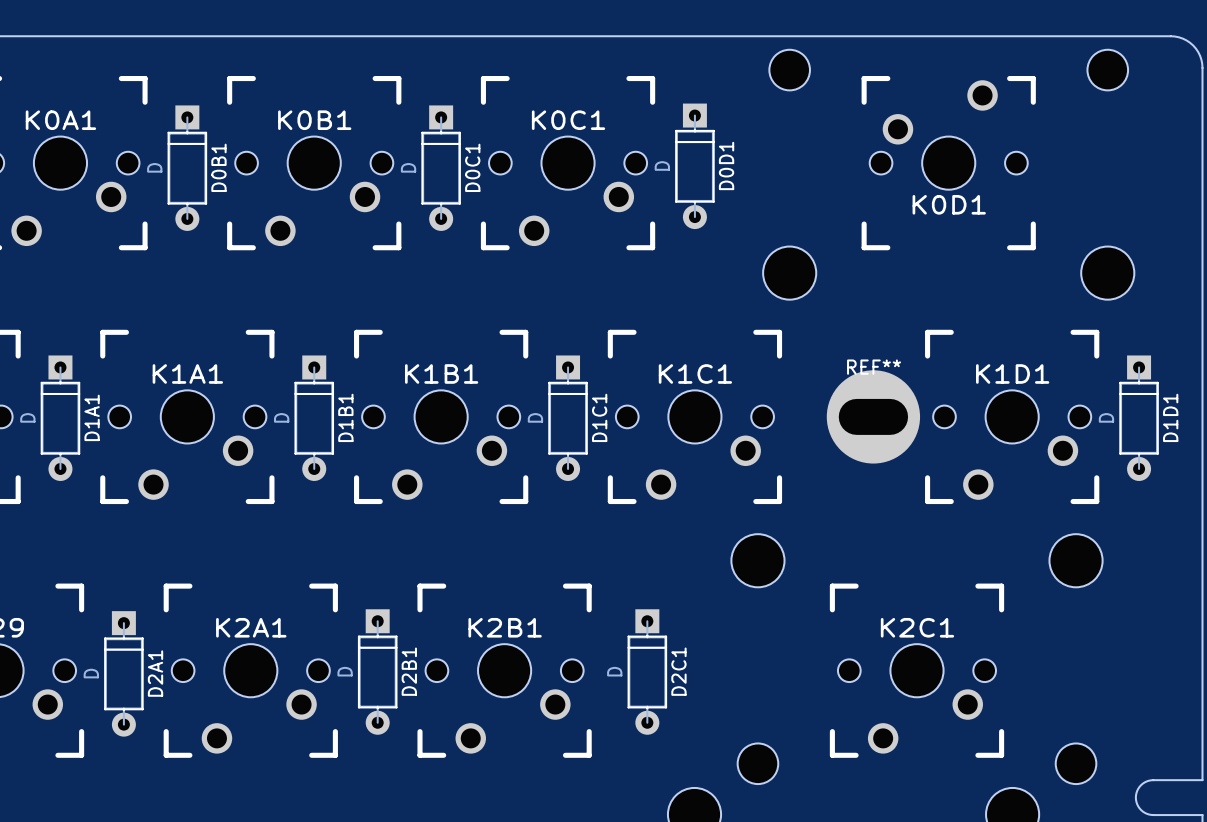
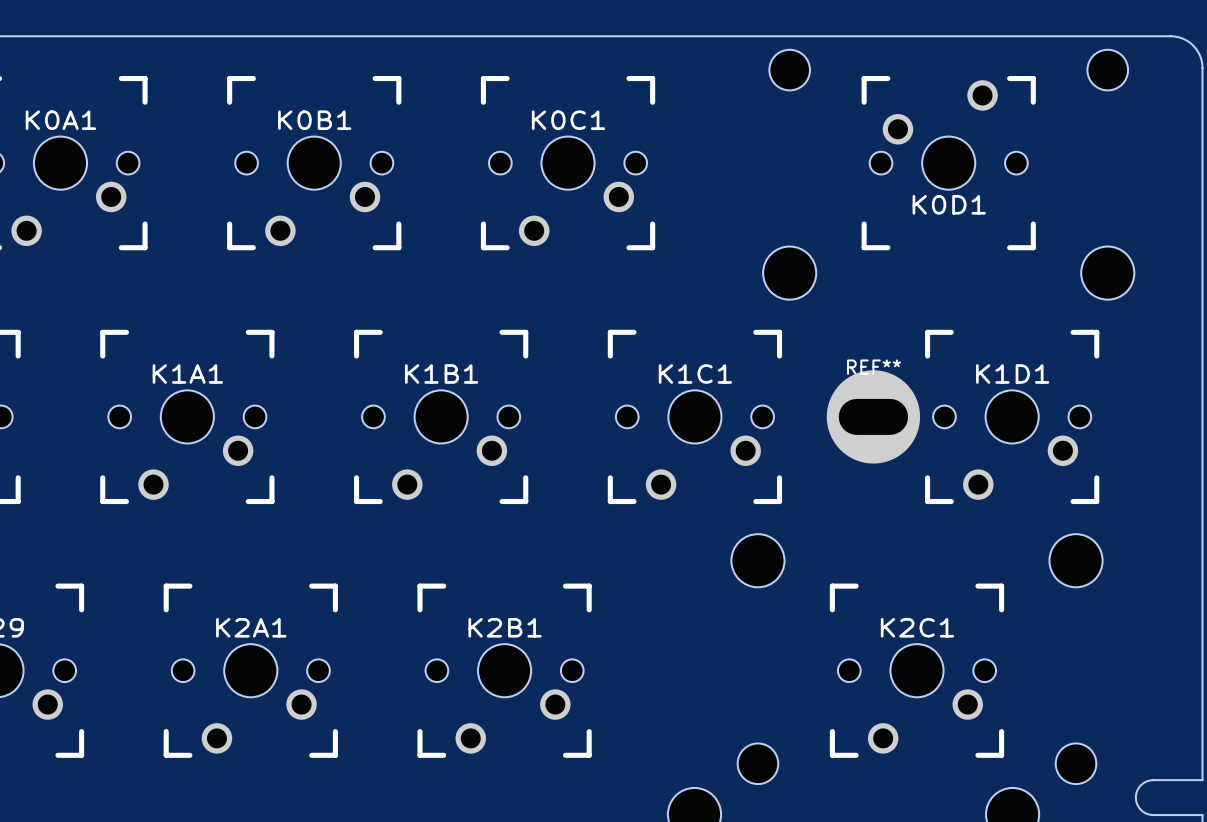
D0D1: D (694, 166) -> none
D0B1: D (187, 168) -> none
D0C1: D (441, 168) -> none
D1A1: D (60, 418) -> none
D1B1: D (314, 418) -> none
D1C1: D (568, 418) -> none
D1D1: D (1139, 418) -> none
D2B1: D (377, 672) -> none
D2C1: D (647, 672) -> none
D2A1: D (123, 673) -> none

